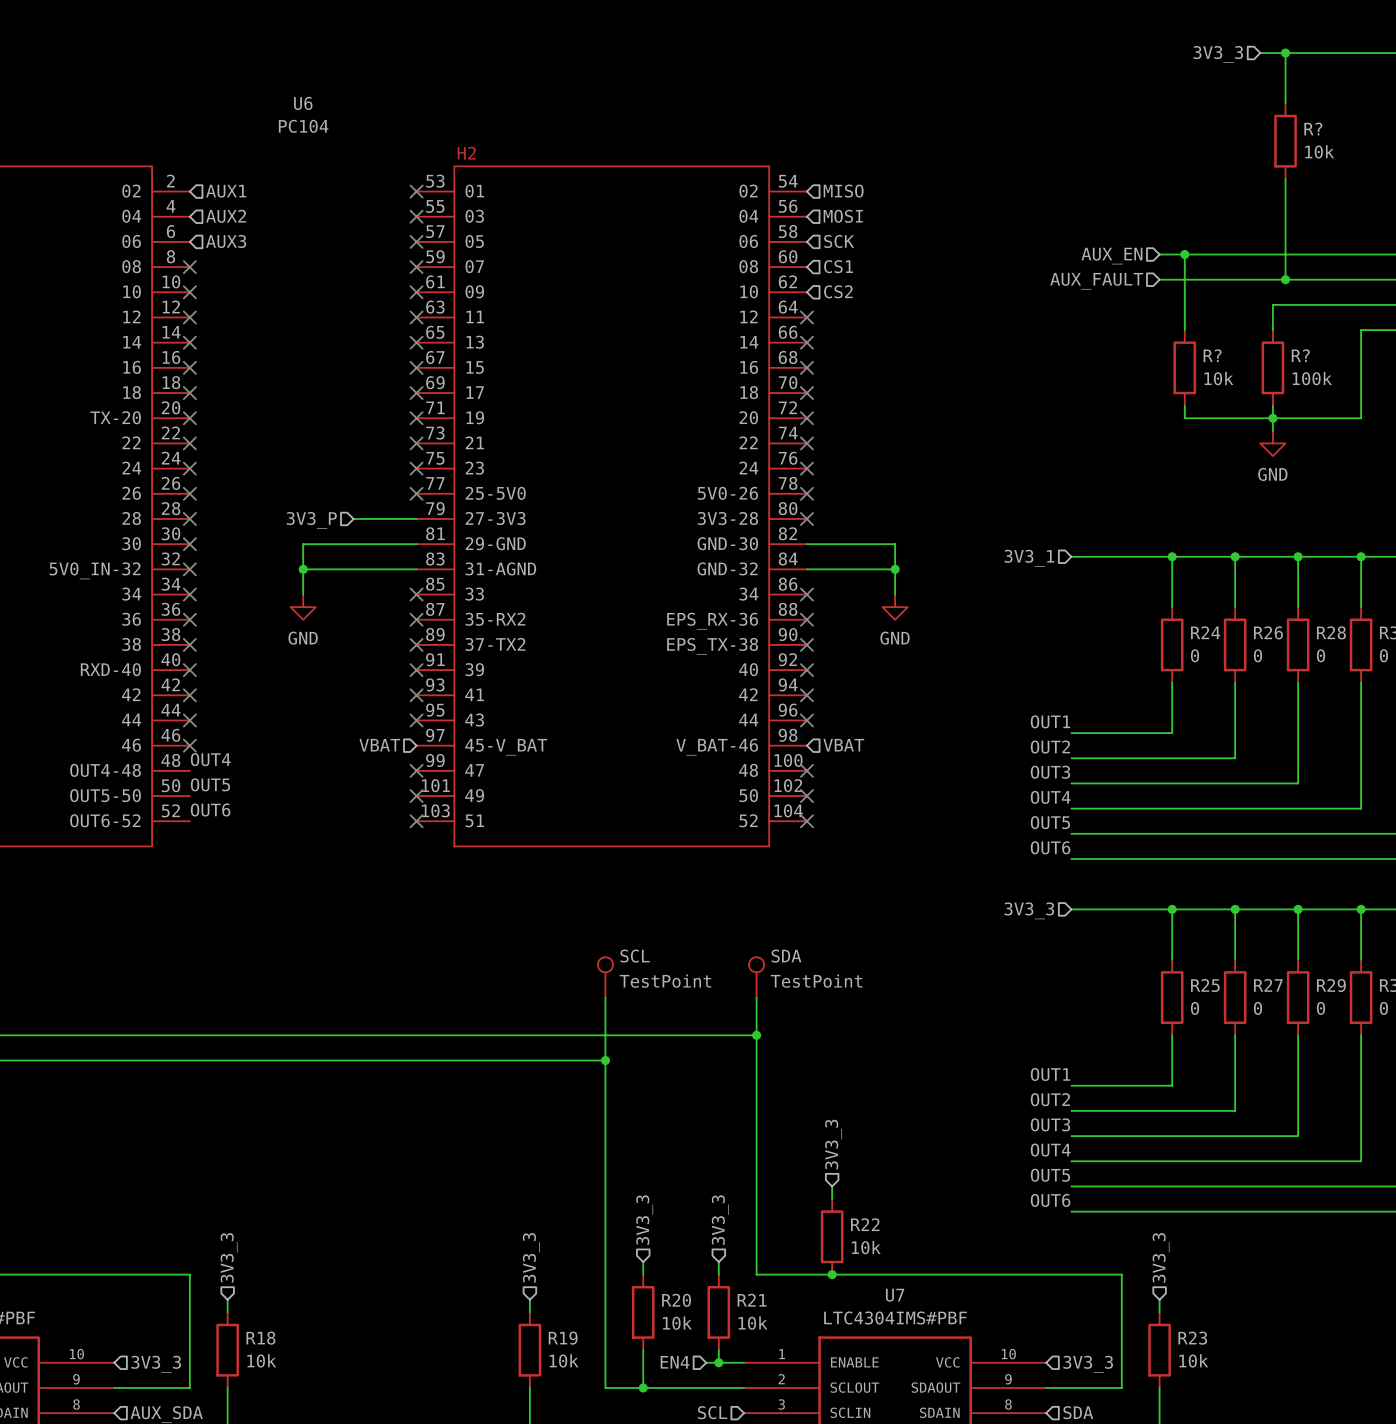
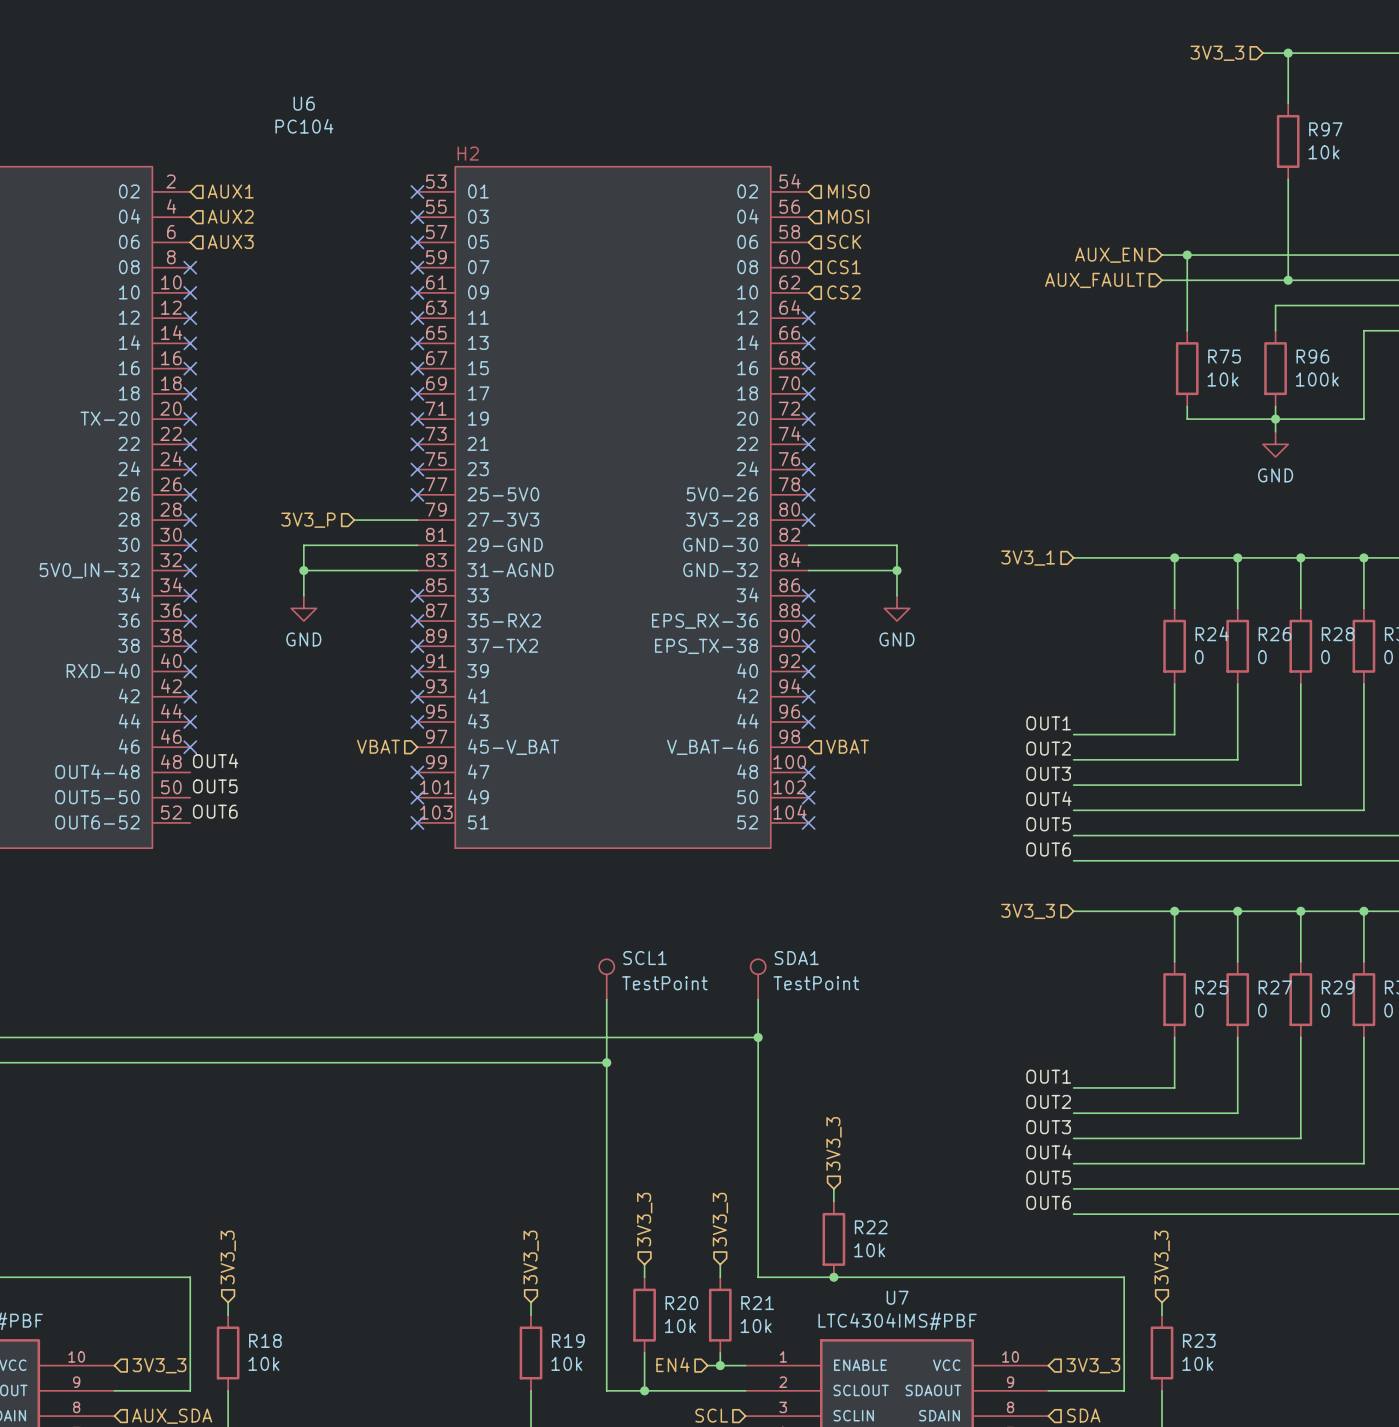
R? name: R? (1313, 129) -> R97 (1325, 129)
R? name: R? (1212, 355) -> R75 (1224, 356)
R? name: R? (1300, 355) -> R96 (1312, 356)
SCL name: SCL (635, 956) -> SCL1 (645, 958)
SDA name: SDA (786, 956) -> SDA1 (796, 958)

